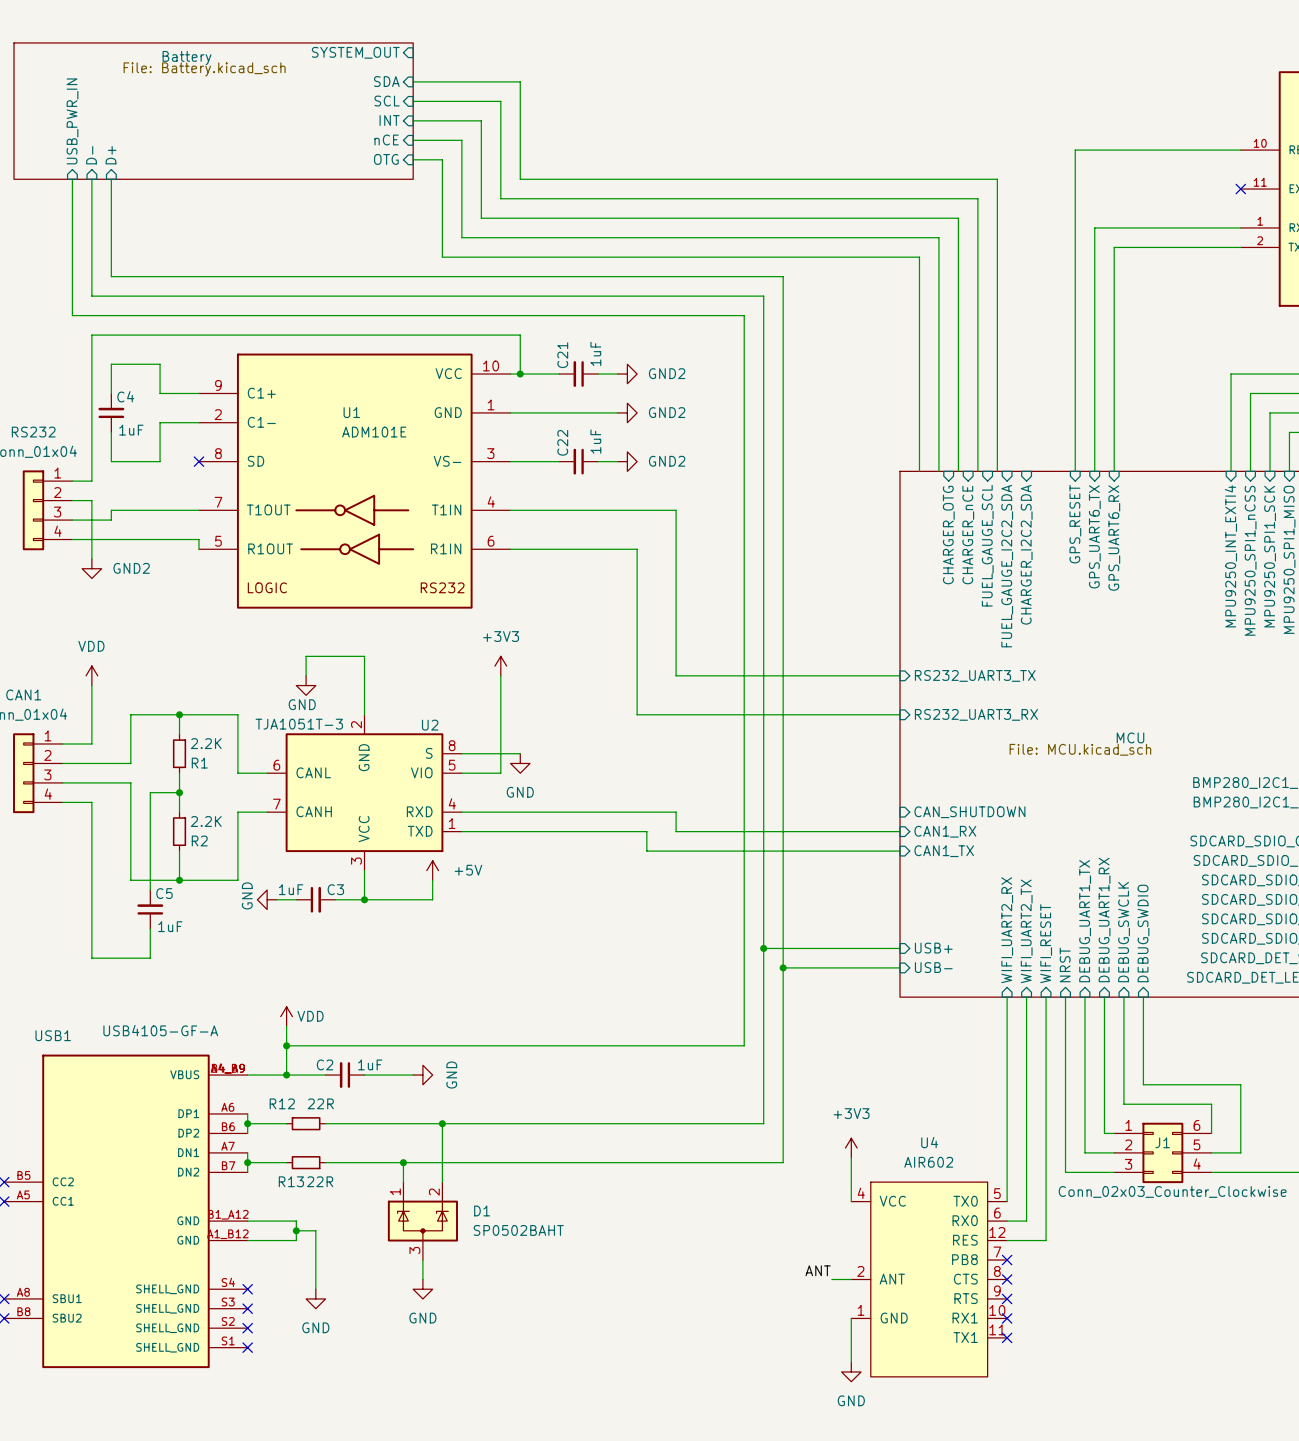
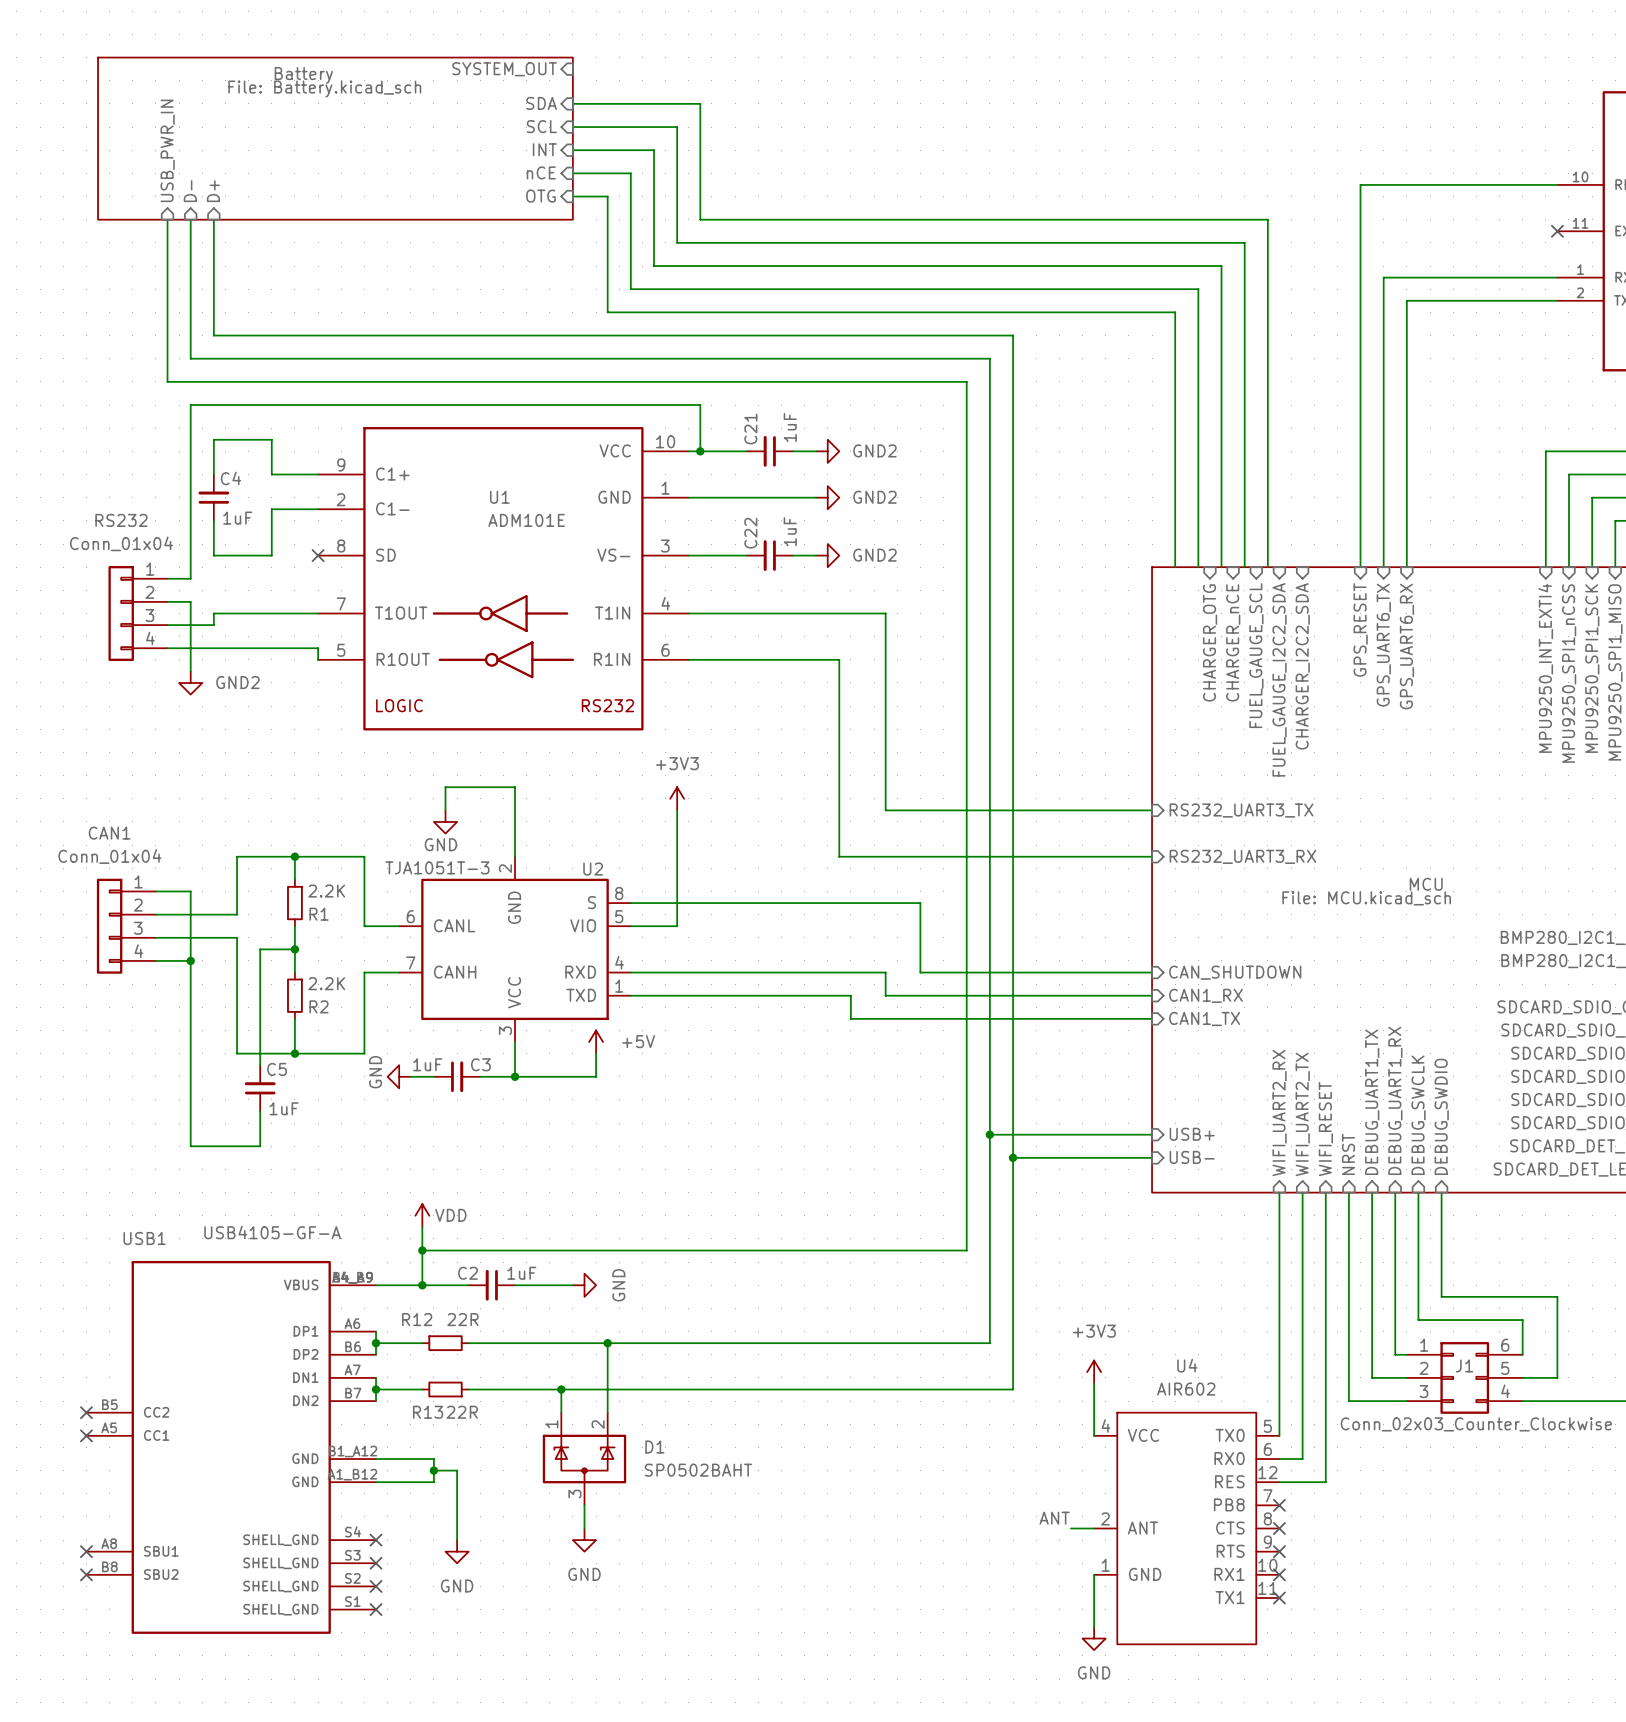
power symbol: VDD (91, 675) -> none
wire: (91, 685) (91, 743) -> (190, 960) (190, 891)
wire: none -> (700, 903) (920, 903) (920, 972) (1152, 972)
power symbol: GND (520, 763) -> none
junction: none -> (190, 960)

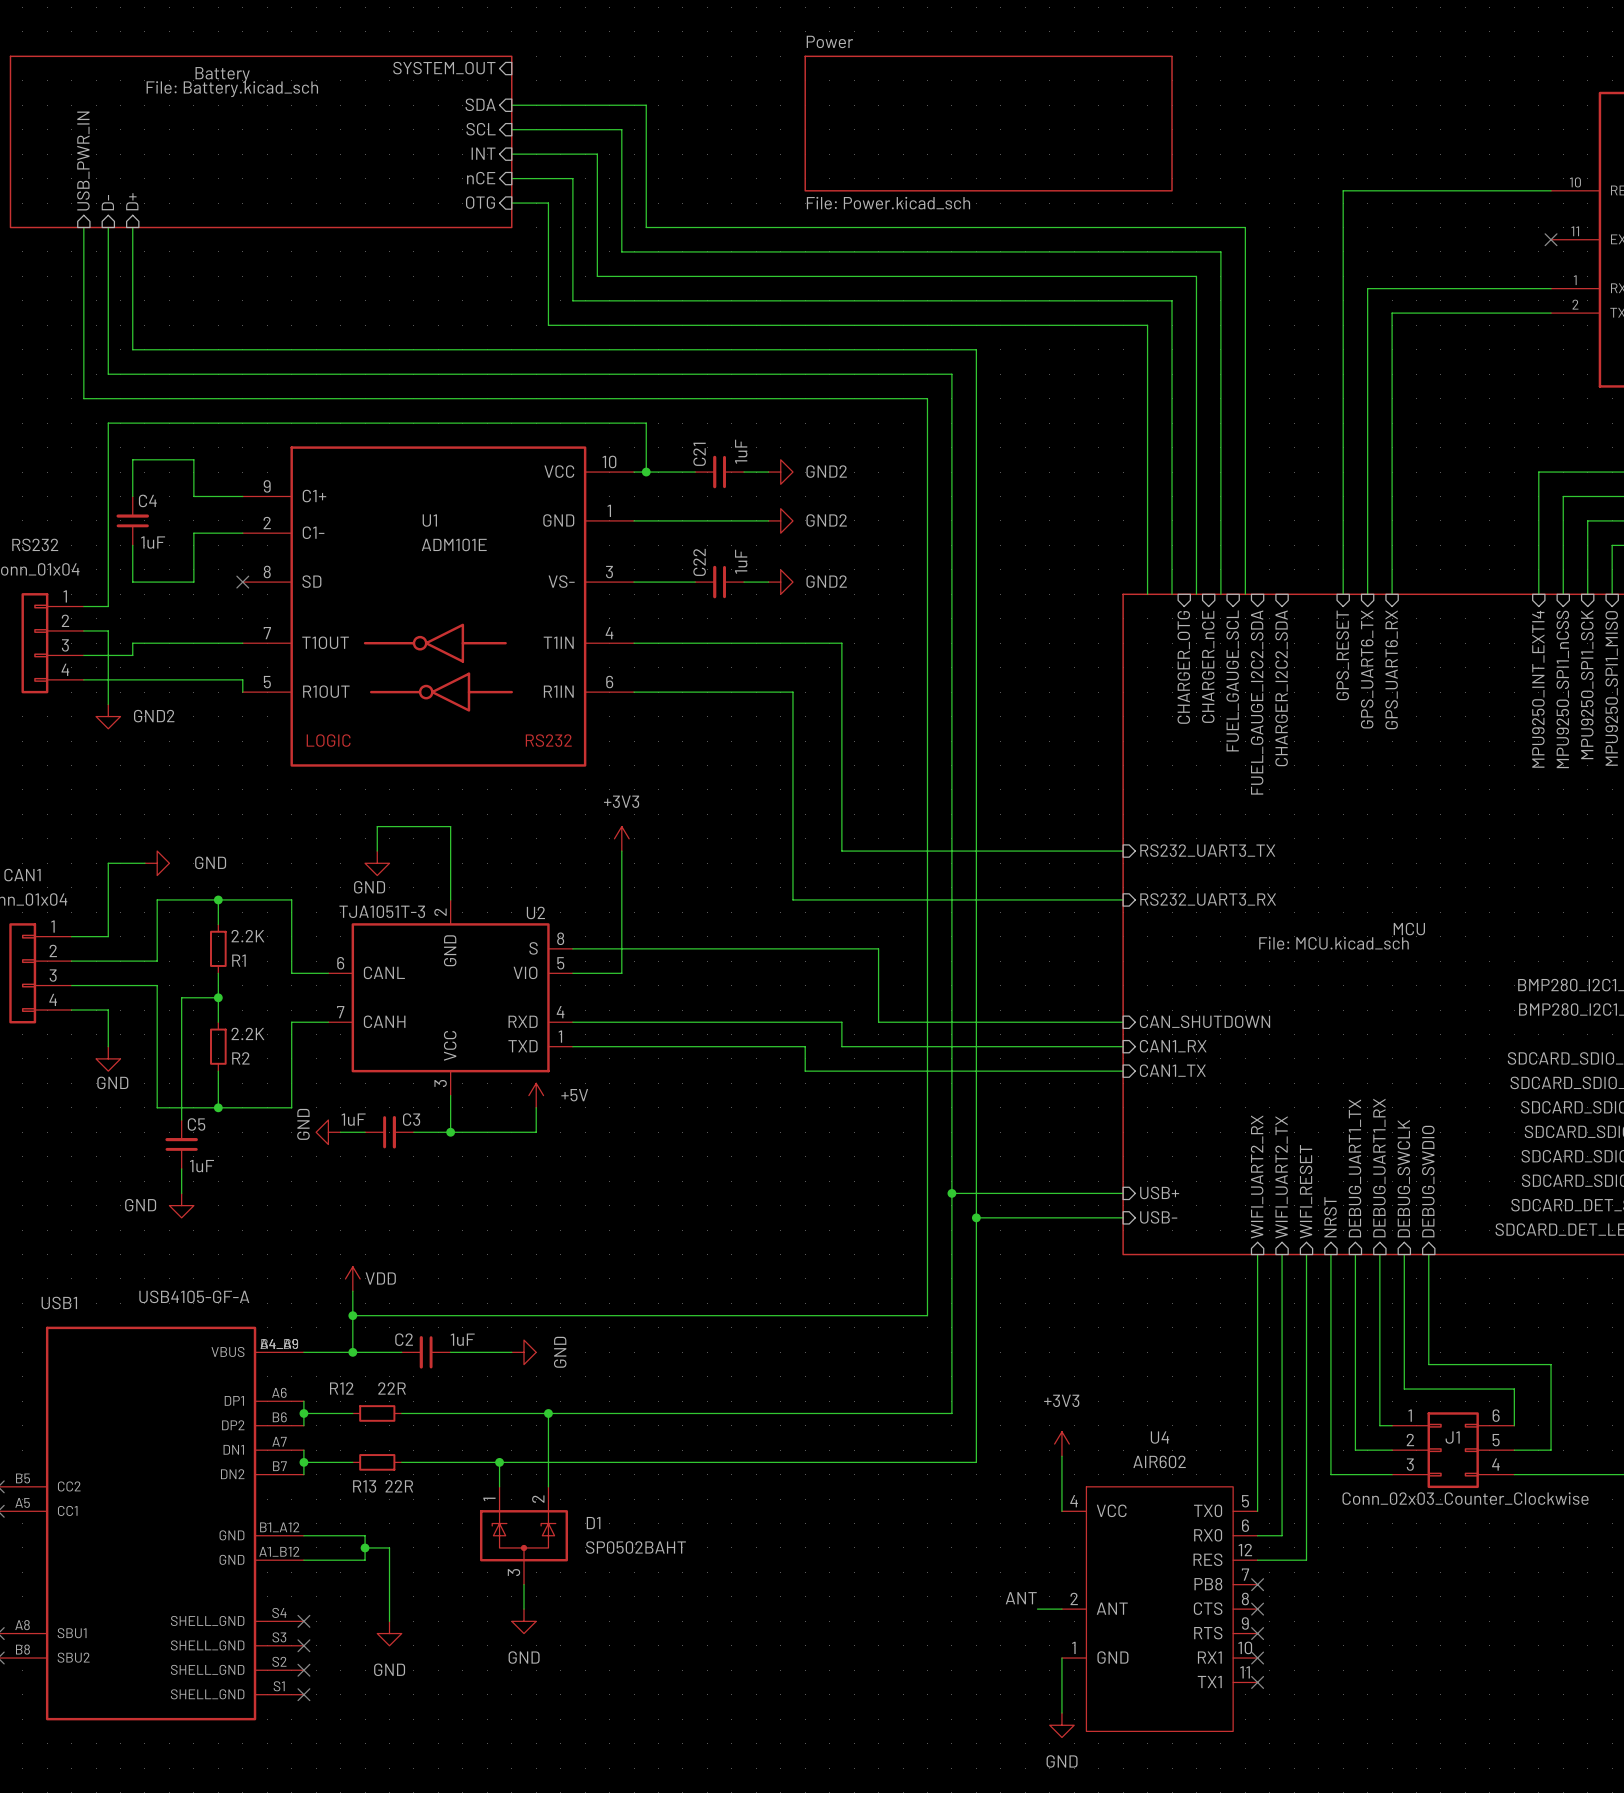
sheet Power: none -> File: Power.kicad_sch (988, 123)
power symbol: none -> GND (157, 863)
wire: (190, 891) (190, 960) -> (108, 936) (108, 863) (144, 863)
junction: (190, 960) -> none
wire: (190, 995) (190, 1146) (260, 1146) (260, 1134) -> none
power symbol: none -> GND (108, 1058)
power symbol: none -> GND (181, 1205)

